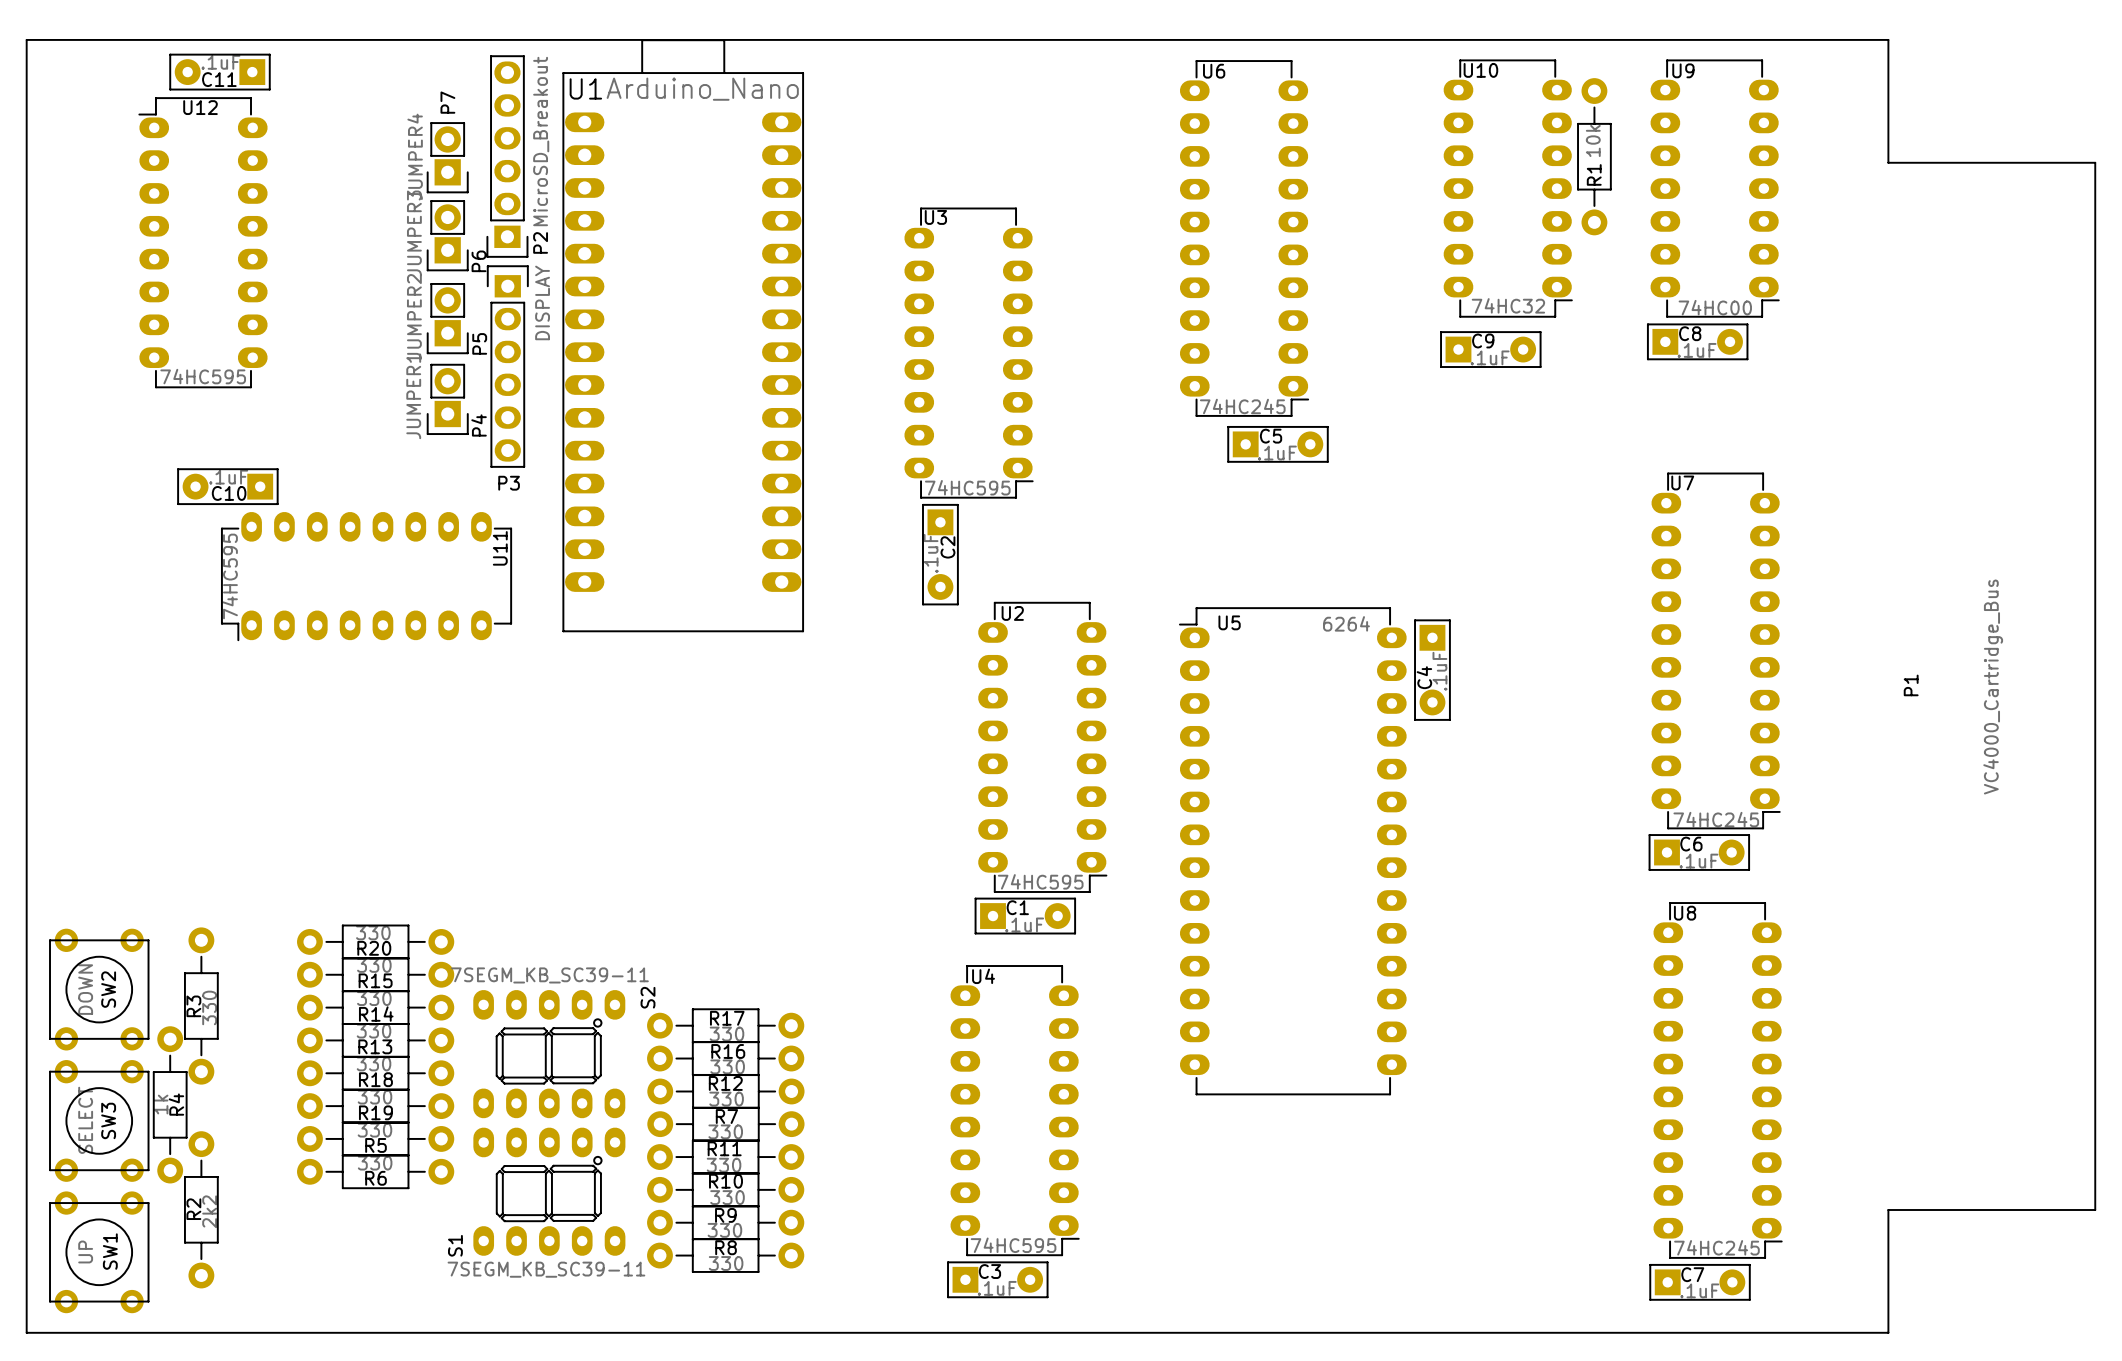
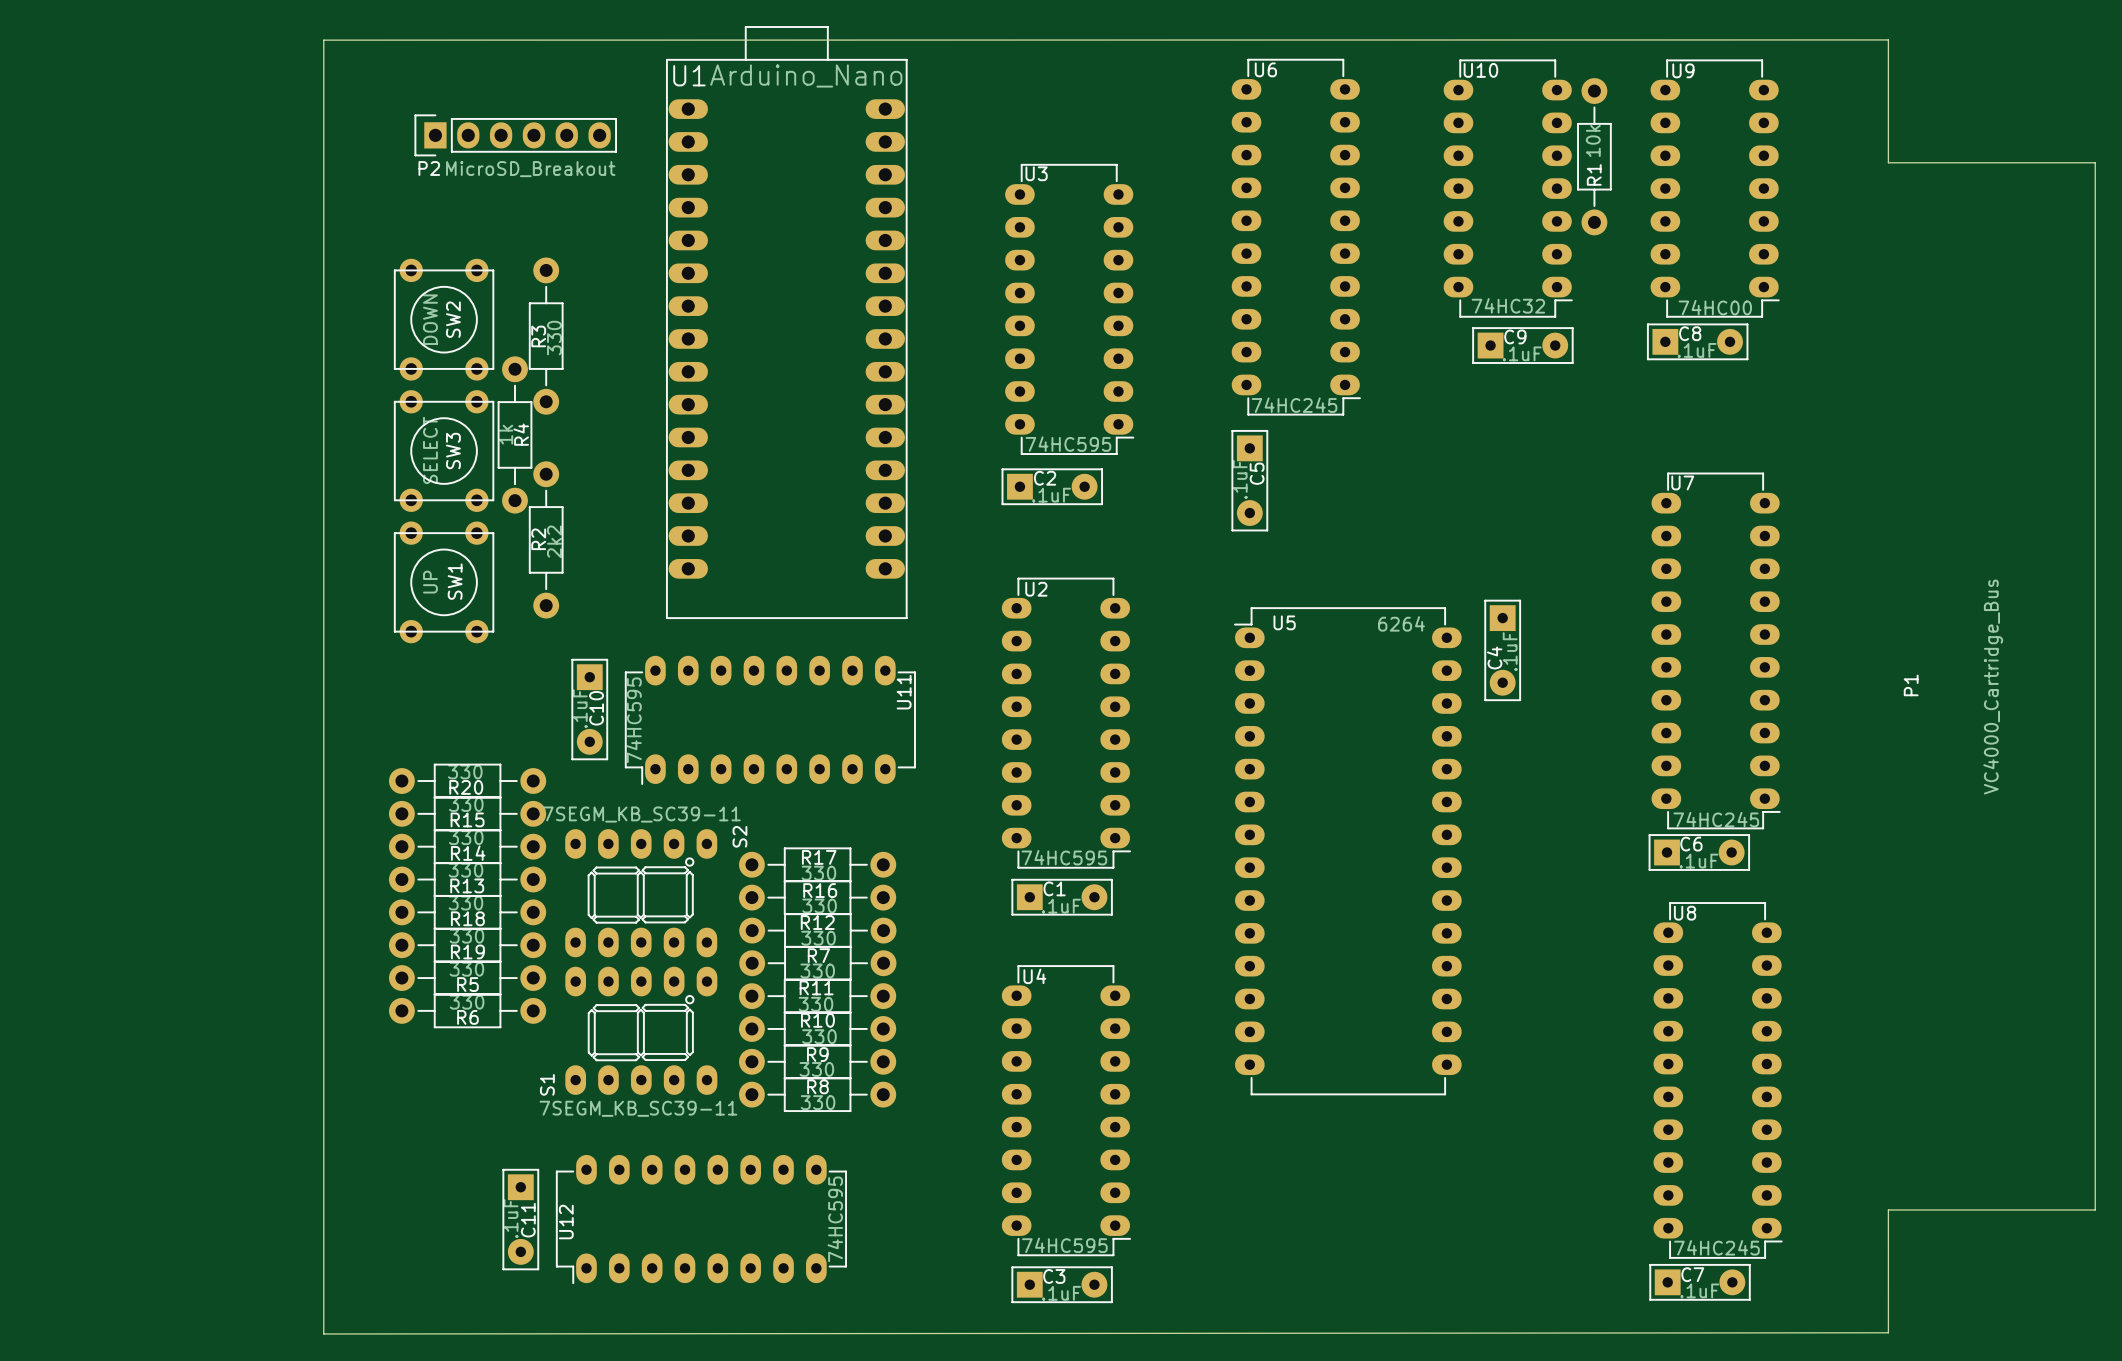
board edge: (1888, 39) (26, 39) (26, 1332) (1888, 1332) -> (1888, 39) (323, 40) (323, 1333) (1888, 1332)
C11 rotation: 0° (219, 72) -> 90° counterclockwise (520, 1219)
C11 position: (219, 72) -> (520, 1219)
P2 rotation: 0° (507, 156) -> 90° clockwise (515, 135)
P7: JUMPER4 (447, 157) -> none
P6: JUMPER3 (447, 235) -> none
U6 position: (1244, 238) -> (1296, 237)
U12 rotation: 0° (203, 242) -> 90° counterclockwise (701, 1219)
U12 position: (203, 242) -> (701, 1219)
P5: JUMPER2 (447, 318) -> none
U1 position: (683, 335) -> (786, 322)
C9 position: (1490, 349) -> (1522, 345)
U3 position: (969, 353) -> (1069, 309)
P3: DISPLAY (507, 366) -> none
P4: JUMPER1 (447, 399) -> none
C5 rotation: 0° (1278, 444) -> 90° clockwise (1249, 480)
C10 rotation: 0° (227, 486) -> 90° counterclockwise (589, 709)
C10 position: (227, 486) -> (589, 709)
C2 rotation: 0° (940, 554) -> 90° counterclockwise (1052, 486)
C2 position: (940, 554) -> (1052, 486)
U11 position: (366, 576) -> (770, 720)
C4 position: (1432, 670) -> (1502, 650)
U2 position: (1042, 747) -> (1066, 723)
U5 position: (1292, 851) -> (1347, 851)
C1 position: (1025, 916) -> (1062, 897)
R20 position: (375, 941) -> (467, 781)
R15 position: (375, 974) -> (467, 813)
SW2 position: (99, 989) -> (444, 319)
R3 position: (201, 1006) -> (546, 336)
R14 position: (375, 1007) -> (467, 846)
R17 position: (725, 1025) -> (817, 864)
R13 position: (375, 1040) -> (467, 879)
S2 position: (549, 1054) -> (641, 893)
R16 position: (725, 1058) -> (817, 897)
R18 position: (375, 1073) -> (467, 912)
R12 position: (725, 1091) -> (817, 930)
R4 position: (170, 1104) -> (515, 434)
R19 position: (375, 1106) -> (467, 945)
U4 position: (1015, 1110) -> (1066, 1110)
SW3 position: (99, 1120) -> (444, 451)
R7 position: (725, 1124) -> (817, 963)
R5 position: (375, 1138) -> (467, 978)
R11 position: (725, 1157) -> (817, 996)
R6 position: (375, 1171) -> (467, 1010)
R10 position: (725, 1189) -> (817, 1028)
S1 position: (549, 1191) -> (641, 1030)
R2 position: (201, 1209) -> (546, 539)
R9 position: (725, 1222) -> (817, 1061)
SW1 position: (99, 1252) -> (444, 582)
R8 position: (725, 1255) -> (817, 1094)
C3 position: (997, 1279) -> (1062, 1284)

